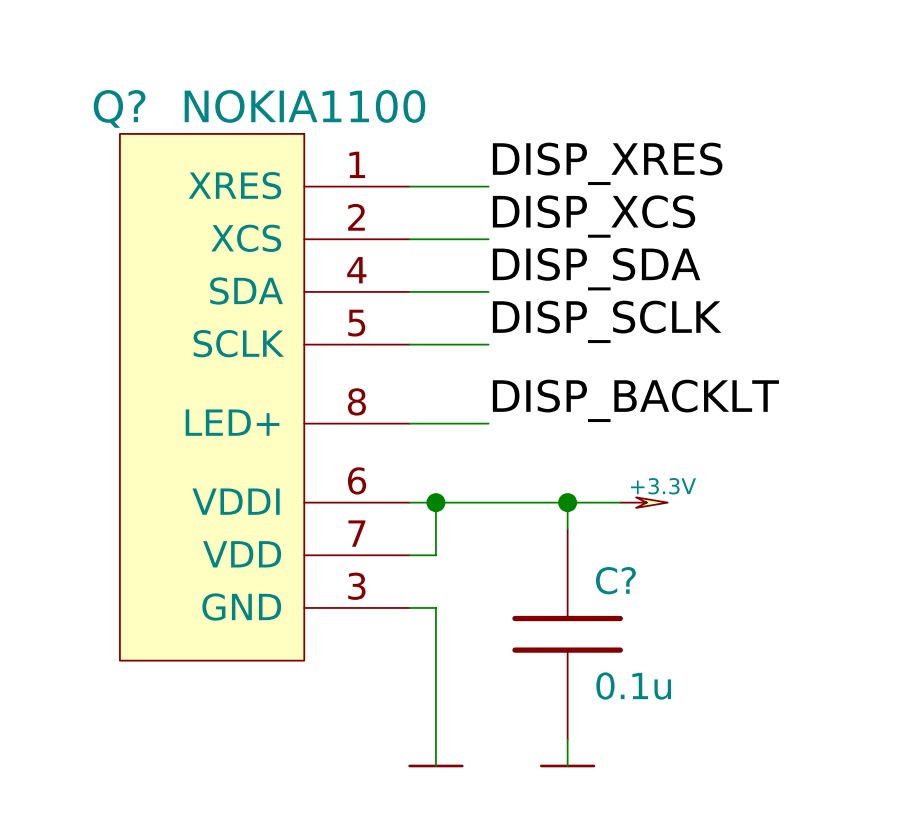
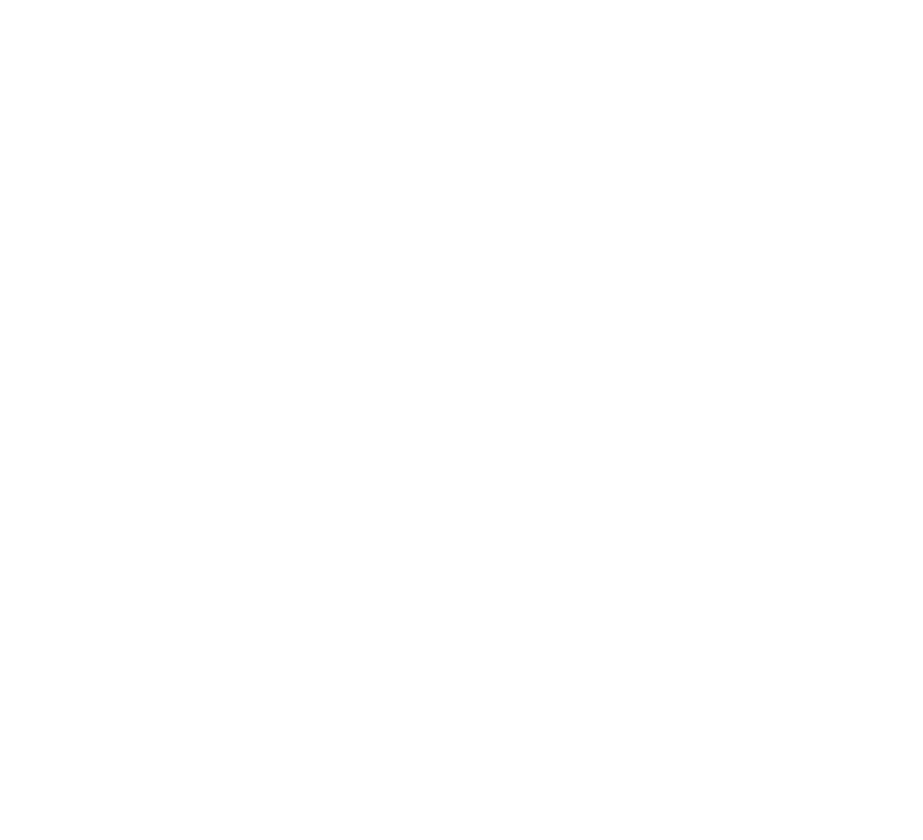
label: DISP_XRES (607, 163) -> none
wire: (409, 186) (488, 186) -> none
label: DISP_XCS (594, 216) -> none
wire: (409, 239) (488, 239) -> none
label: DISP_SDA (596, 269) -> none
wire: (409, 291) (488, 291) -> none
label: DISP_SCLK (607, 321) -> none
wire: (409, 344) (488, 344) -> none
Q?: NOKIA1100 (264, 397) -> none
label: DISP_BACKLT (635, 400) -> none
wire: (409, 423) (488, 423) -> none
wire: (409, 502) (620, 502) -> none
wire: (435, 502) (435, 555) (409, 555) -> none
junction: (435, 502) -> none
wire: (567, 502) (567, 528) -> none
junction: (567, 502) -> none
power symbol: +3.3V (644, 502) -> none
wire: (409, 607) (435, 607) (435, 765) -> none
C?: 0.1u (567, 634) -> none
wire: (567, 739) (567, 765) -> none
power symbol: (435, 765) -> none
power symbol: (567, 765) -> none

